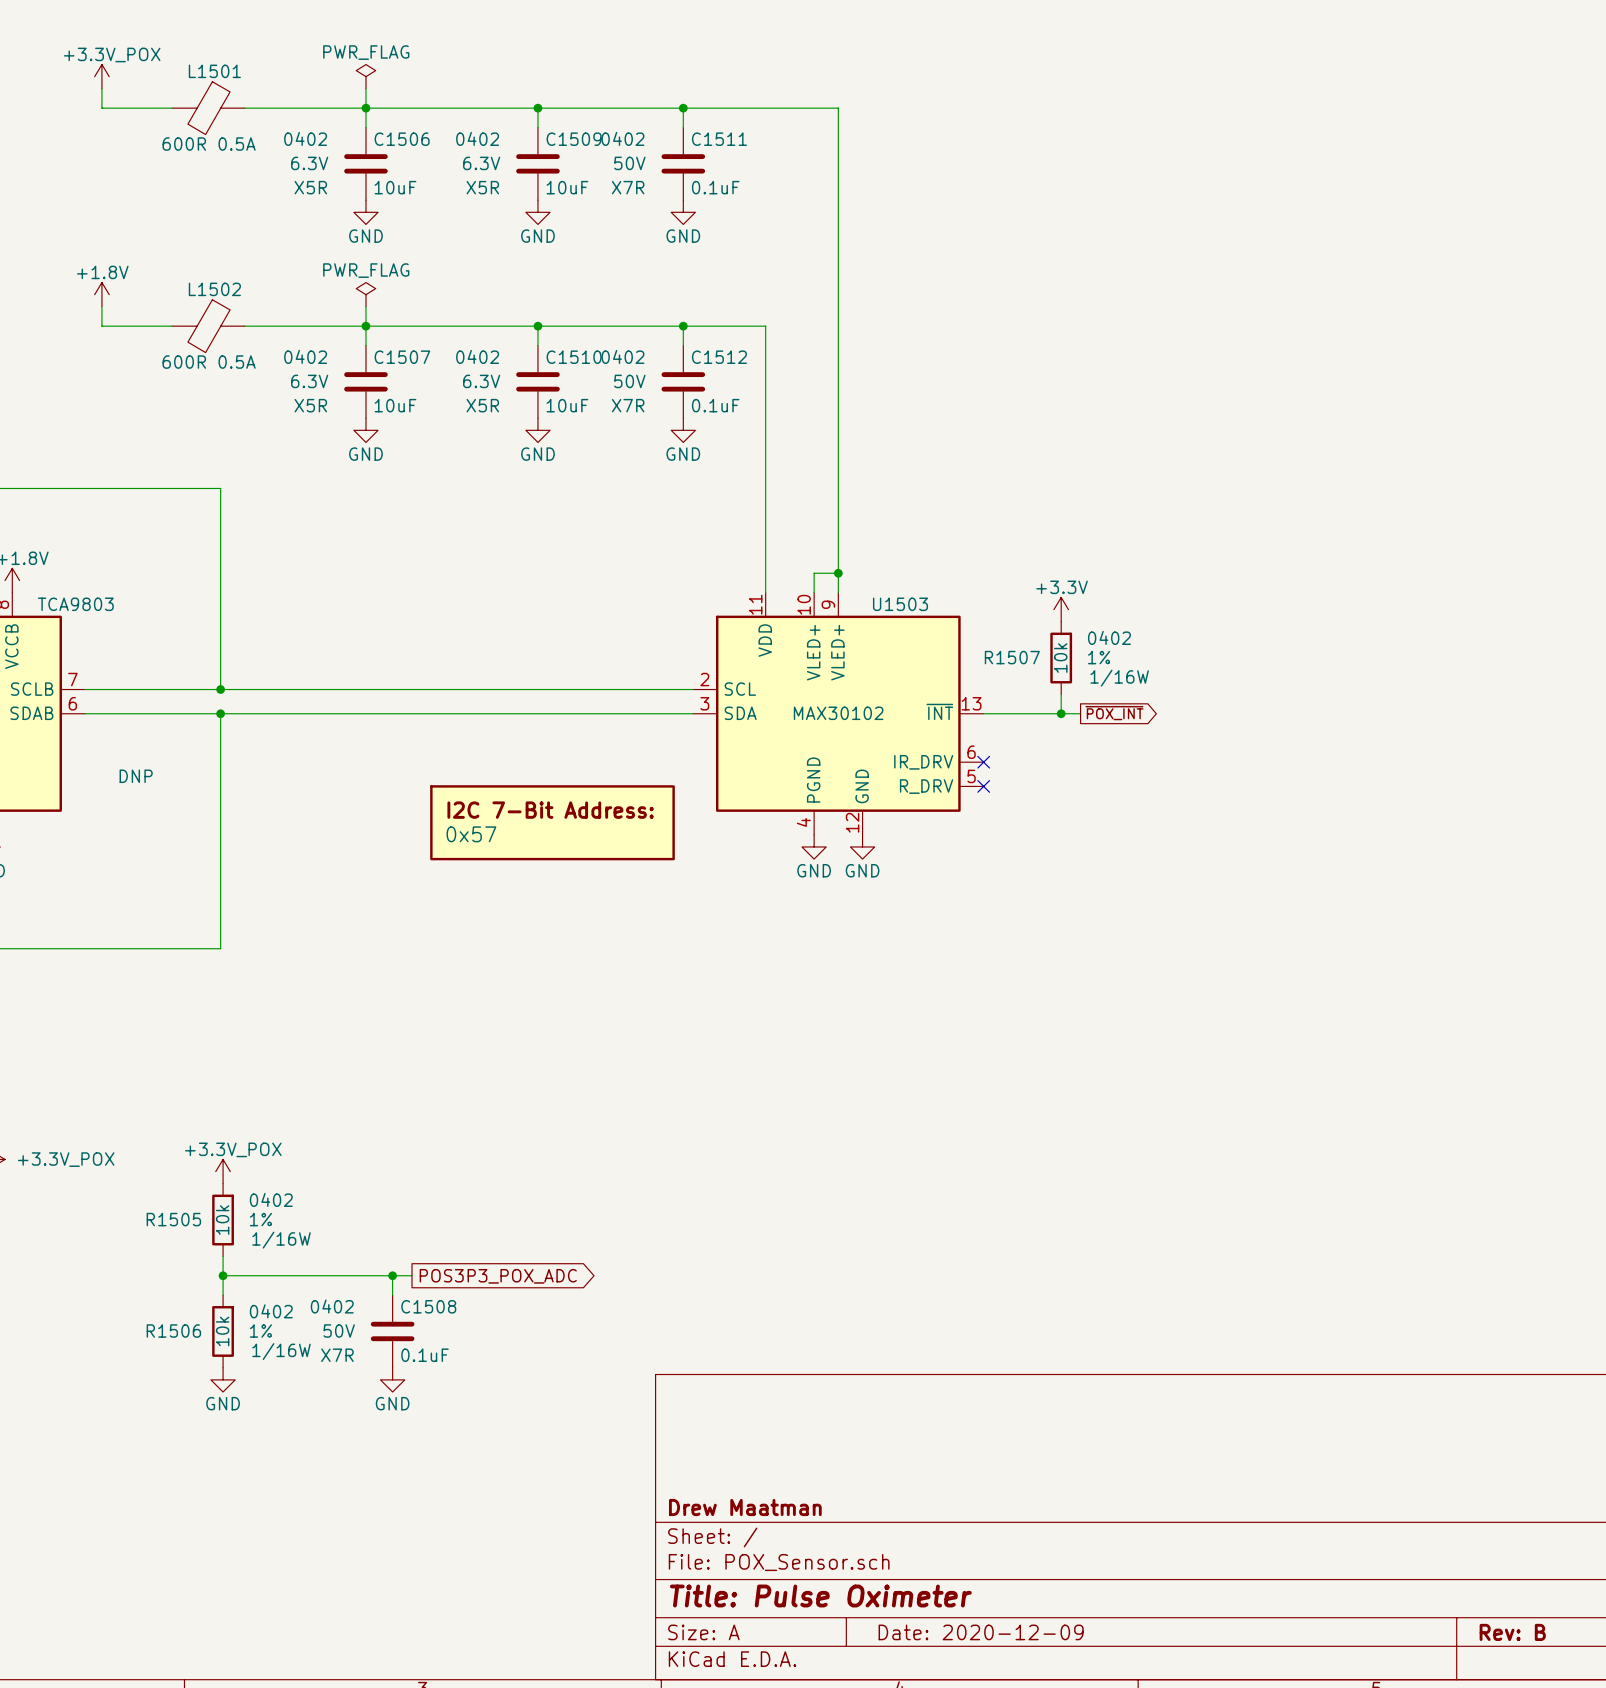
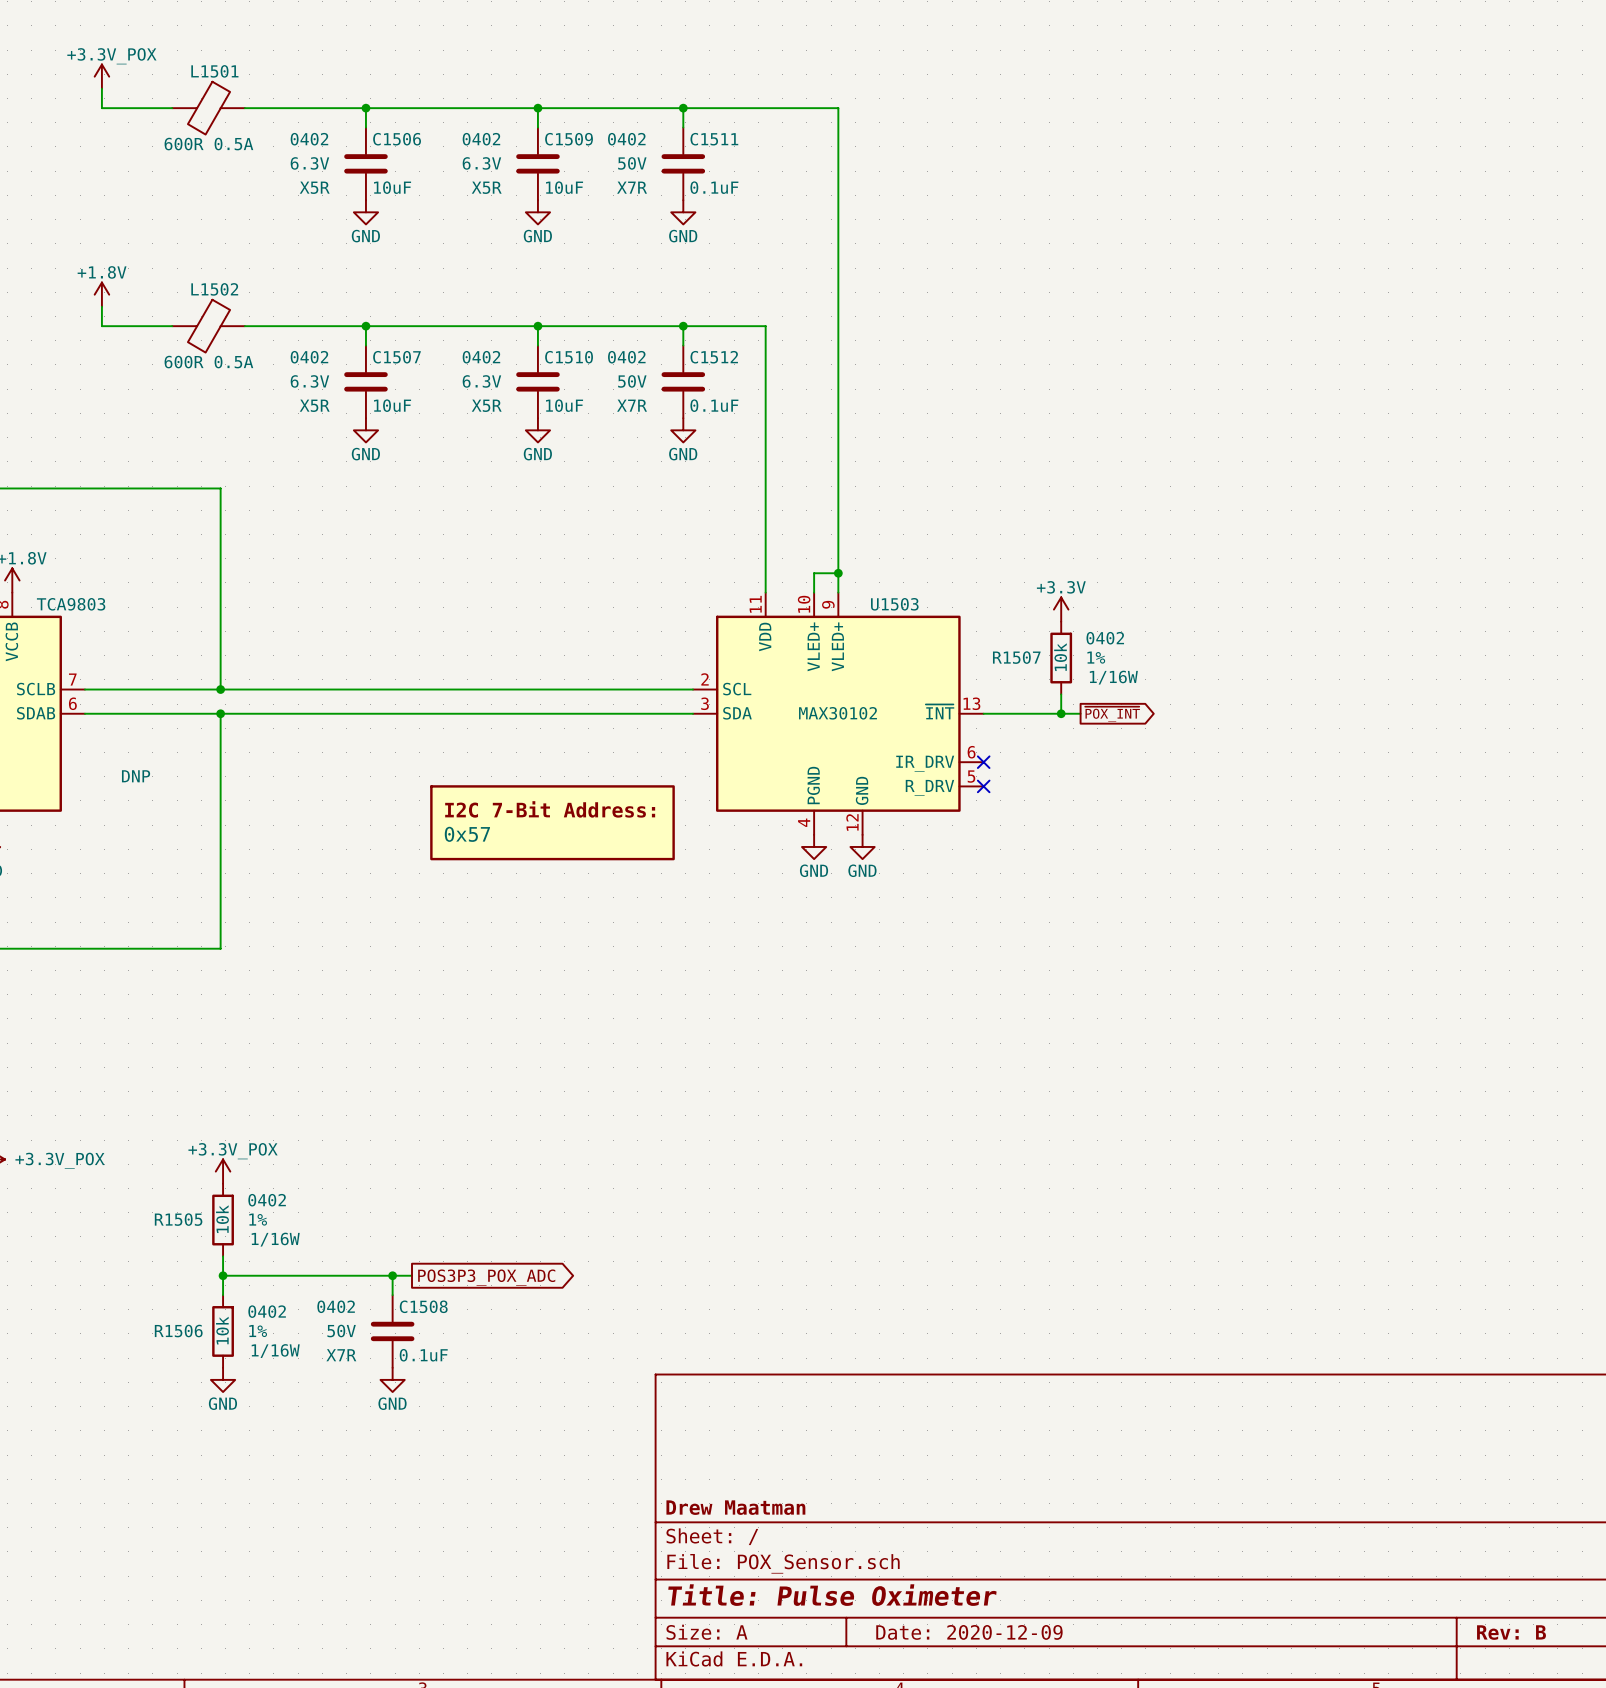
power symbol: PWR_FLAG (365, 76) -> none
wire: (365, 88) (365, 108) -> none
power symbol: PWR_FLAG (365, 294) -> none
wire: (365, 306) (365, 326) -> none

